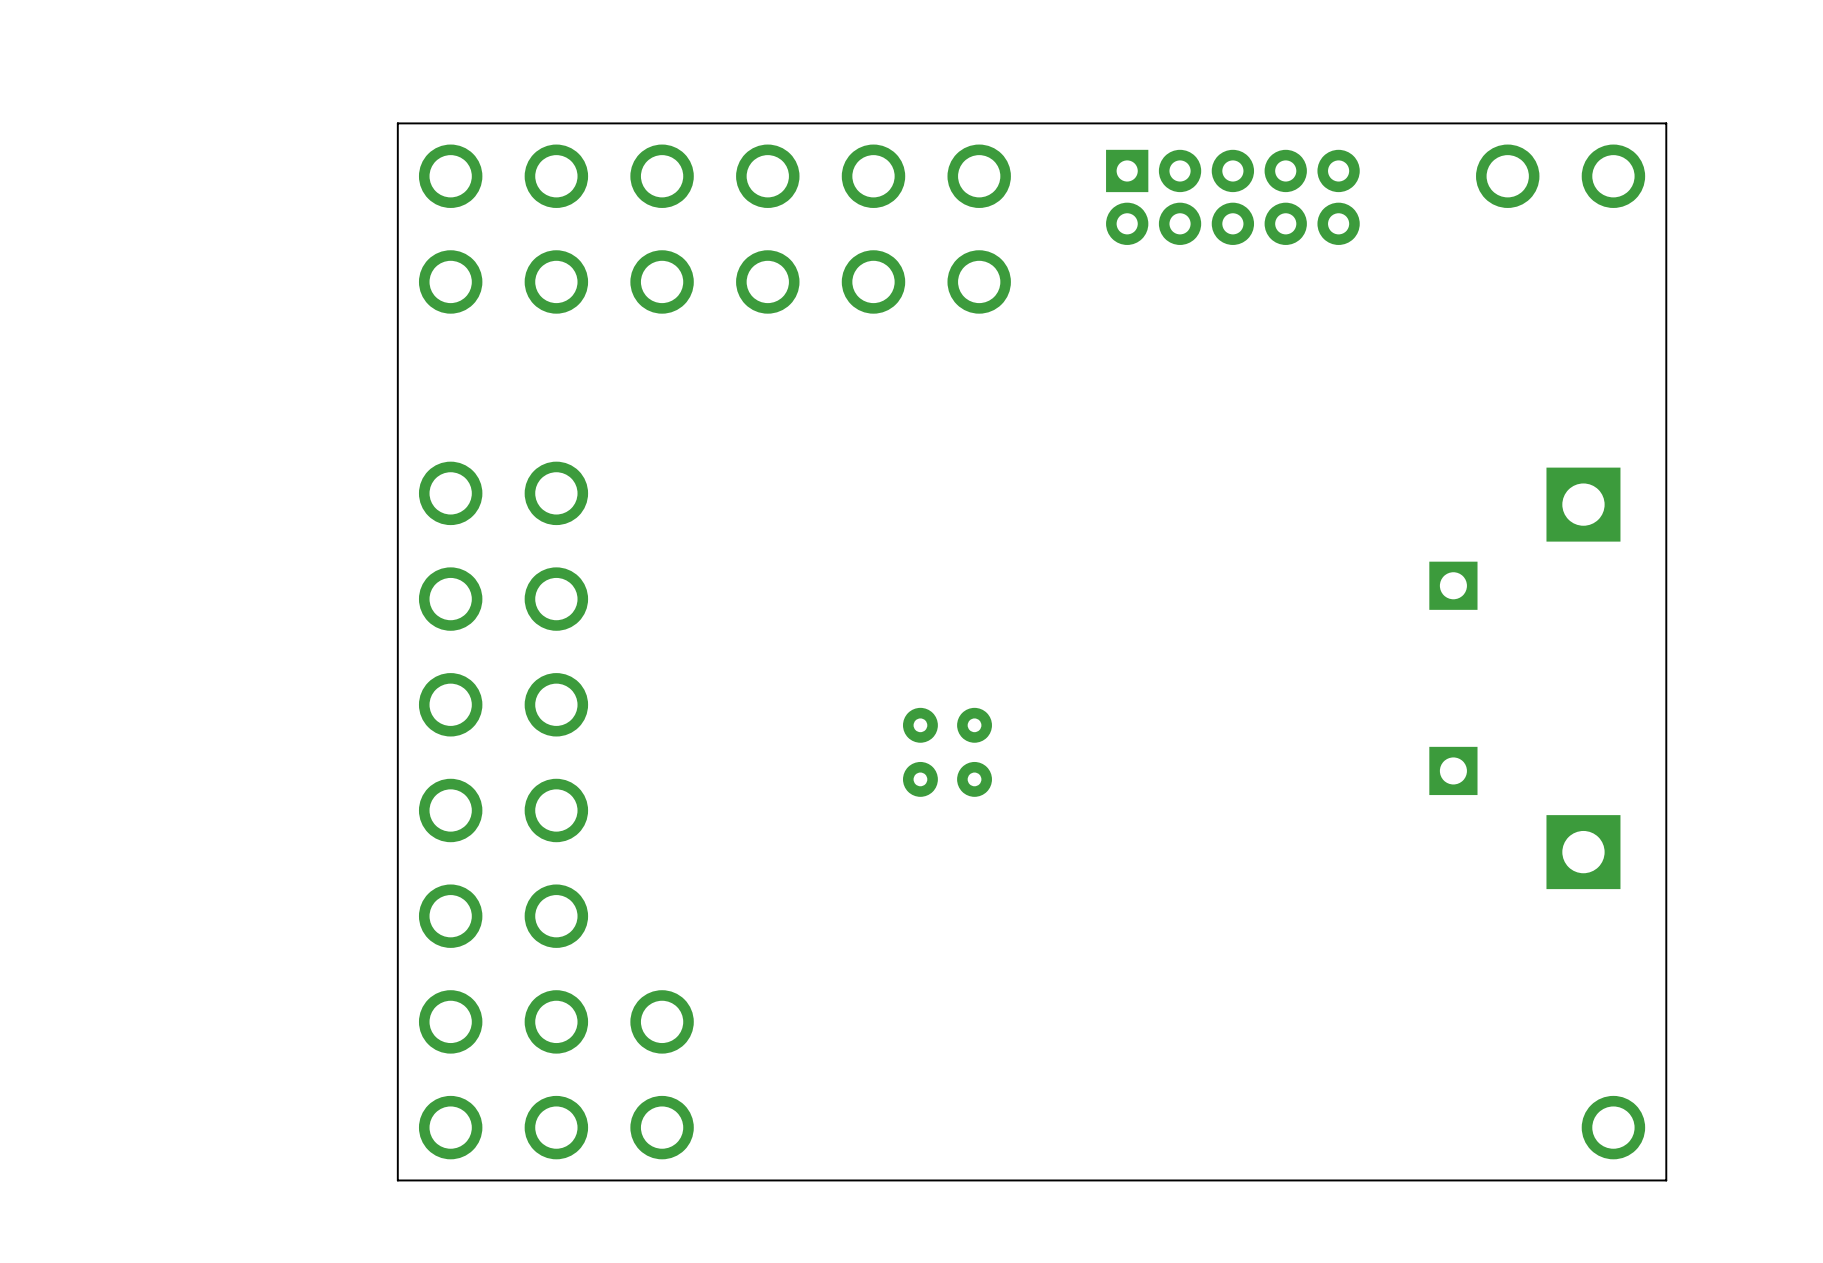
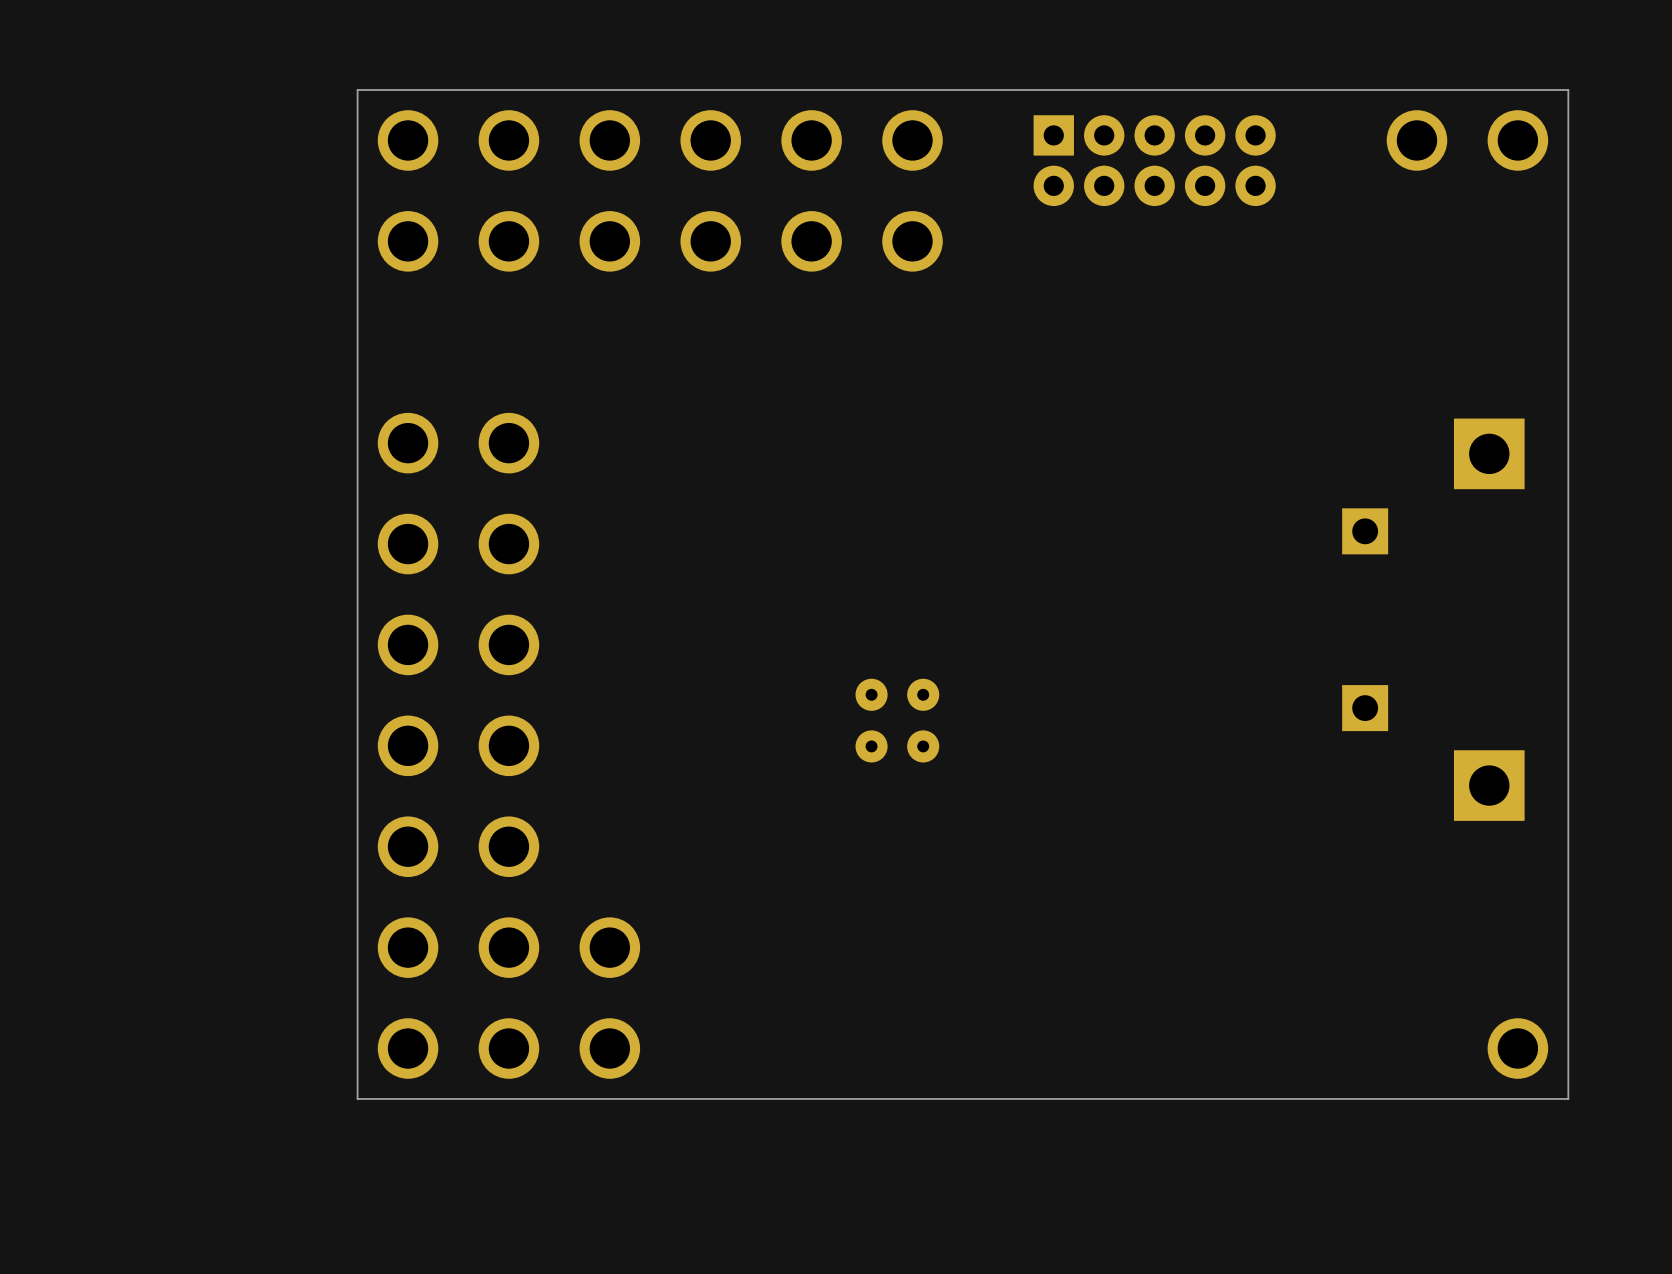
part footprint: [902, 707, 992, 797] -> [855, 678, 940, 763]

